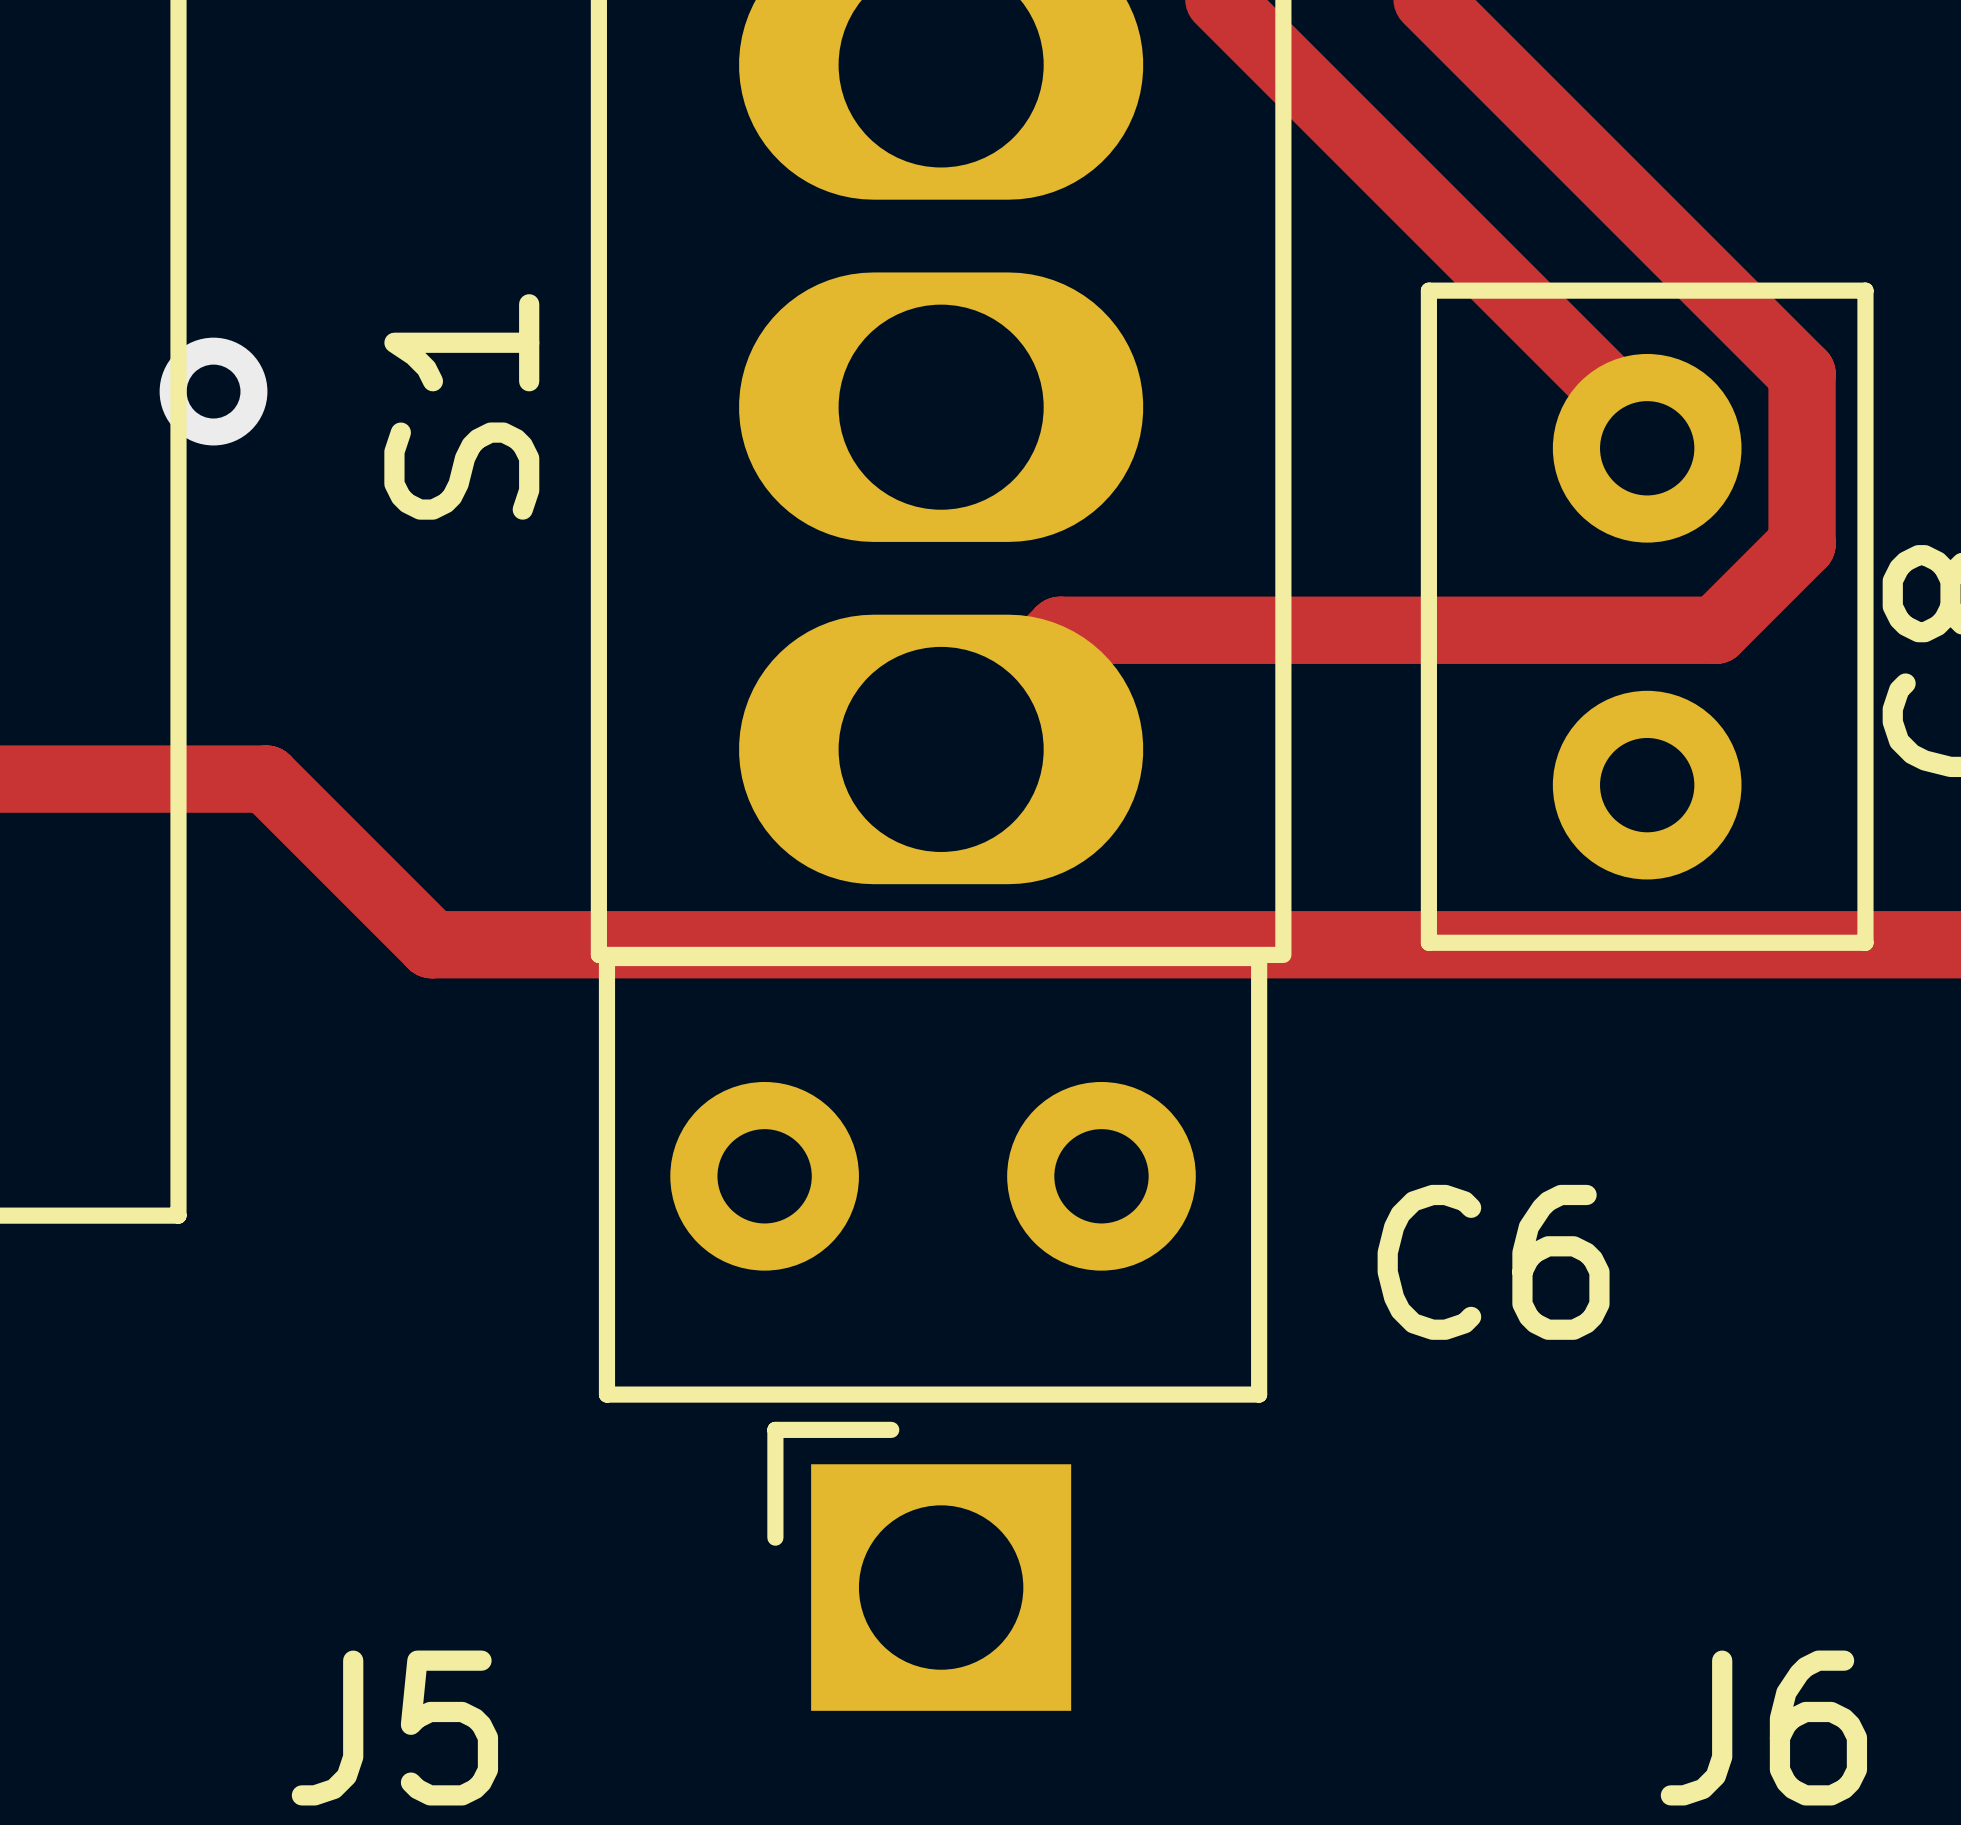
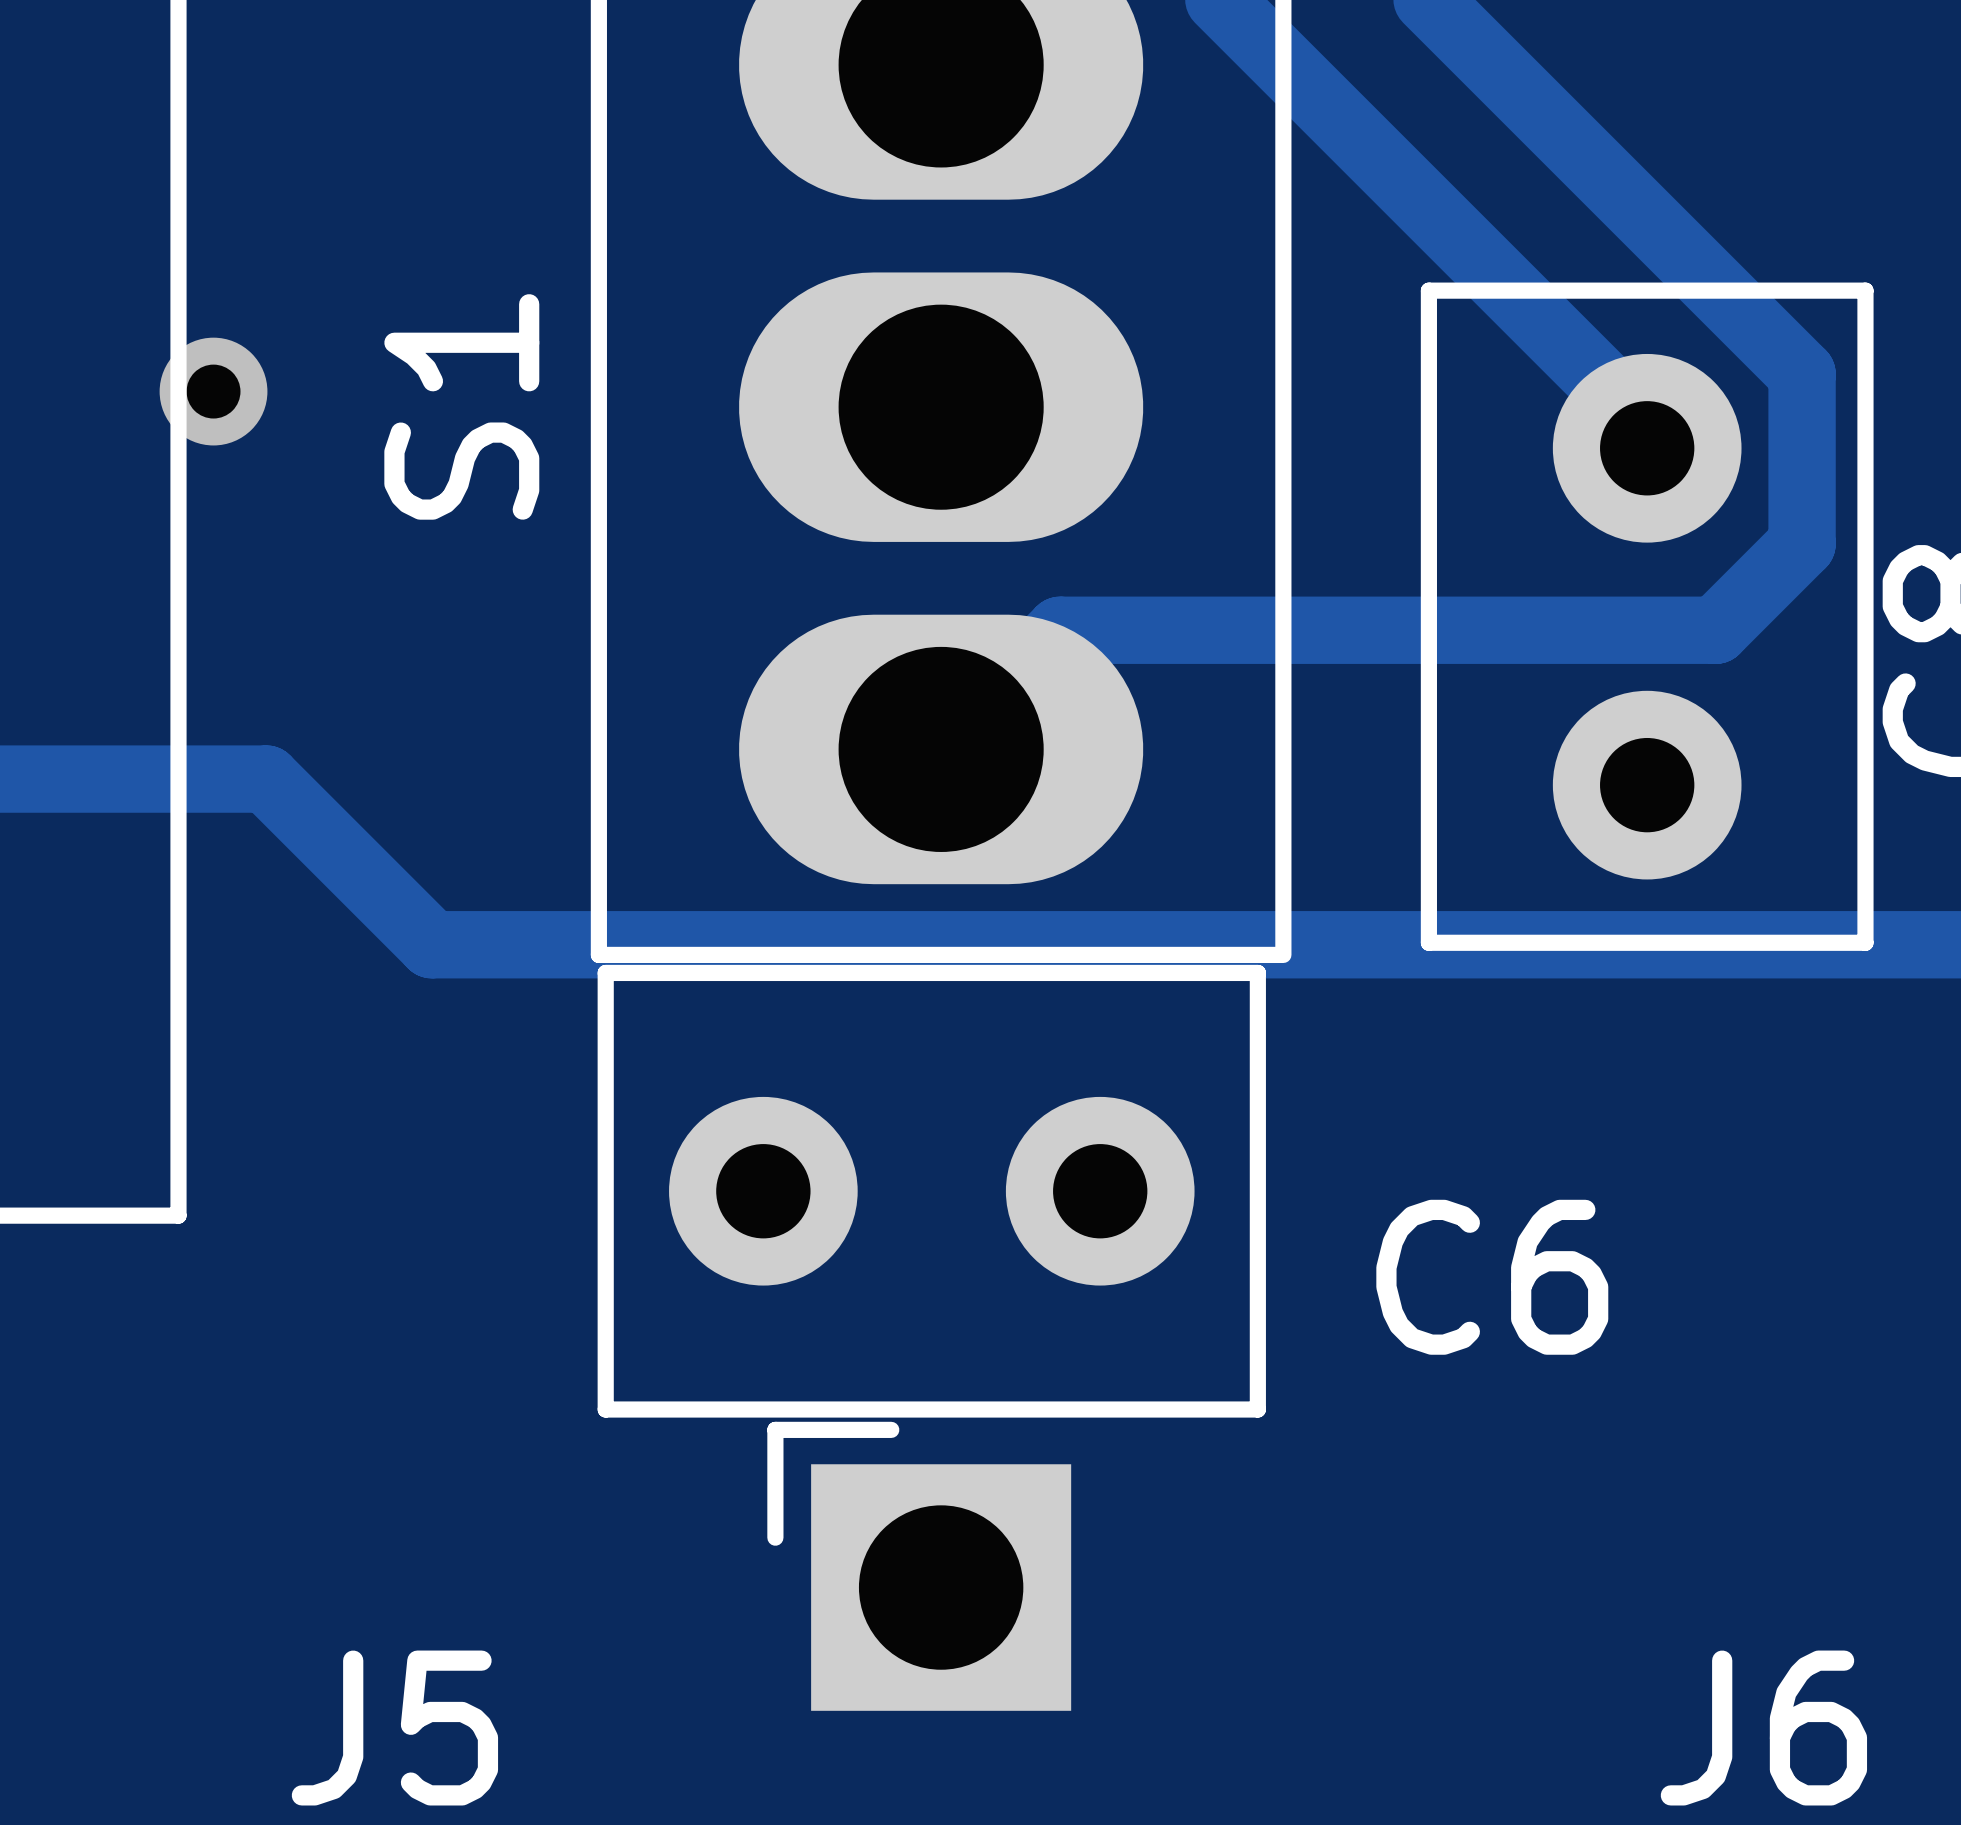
C6 position: (933, 1176) -> (931, 1191)

